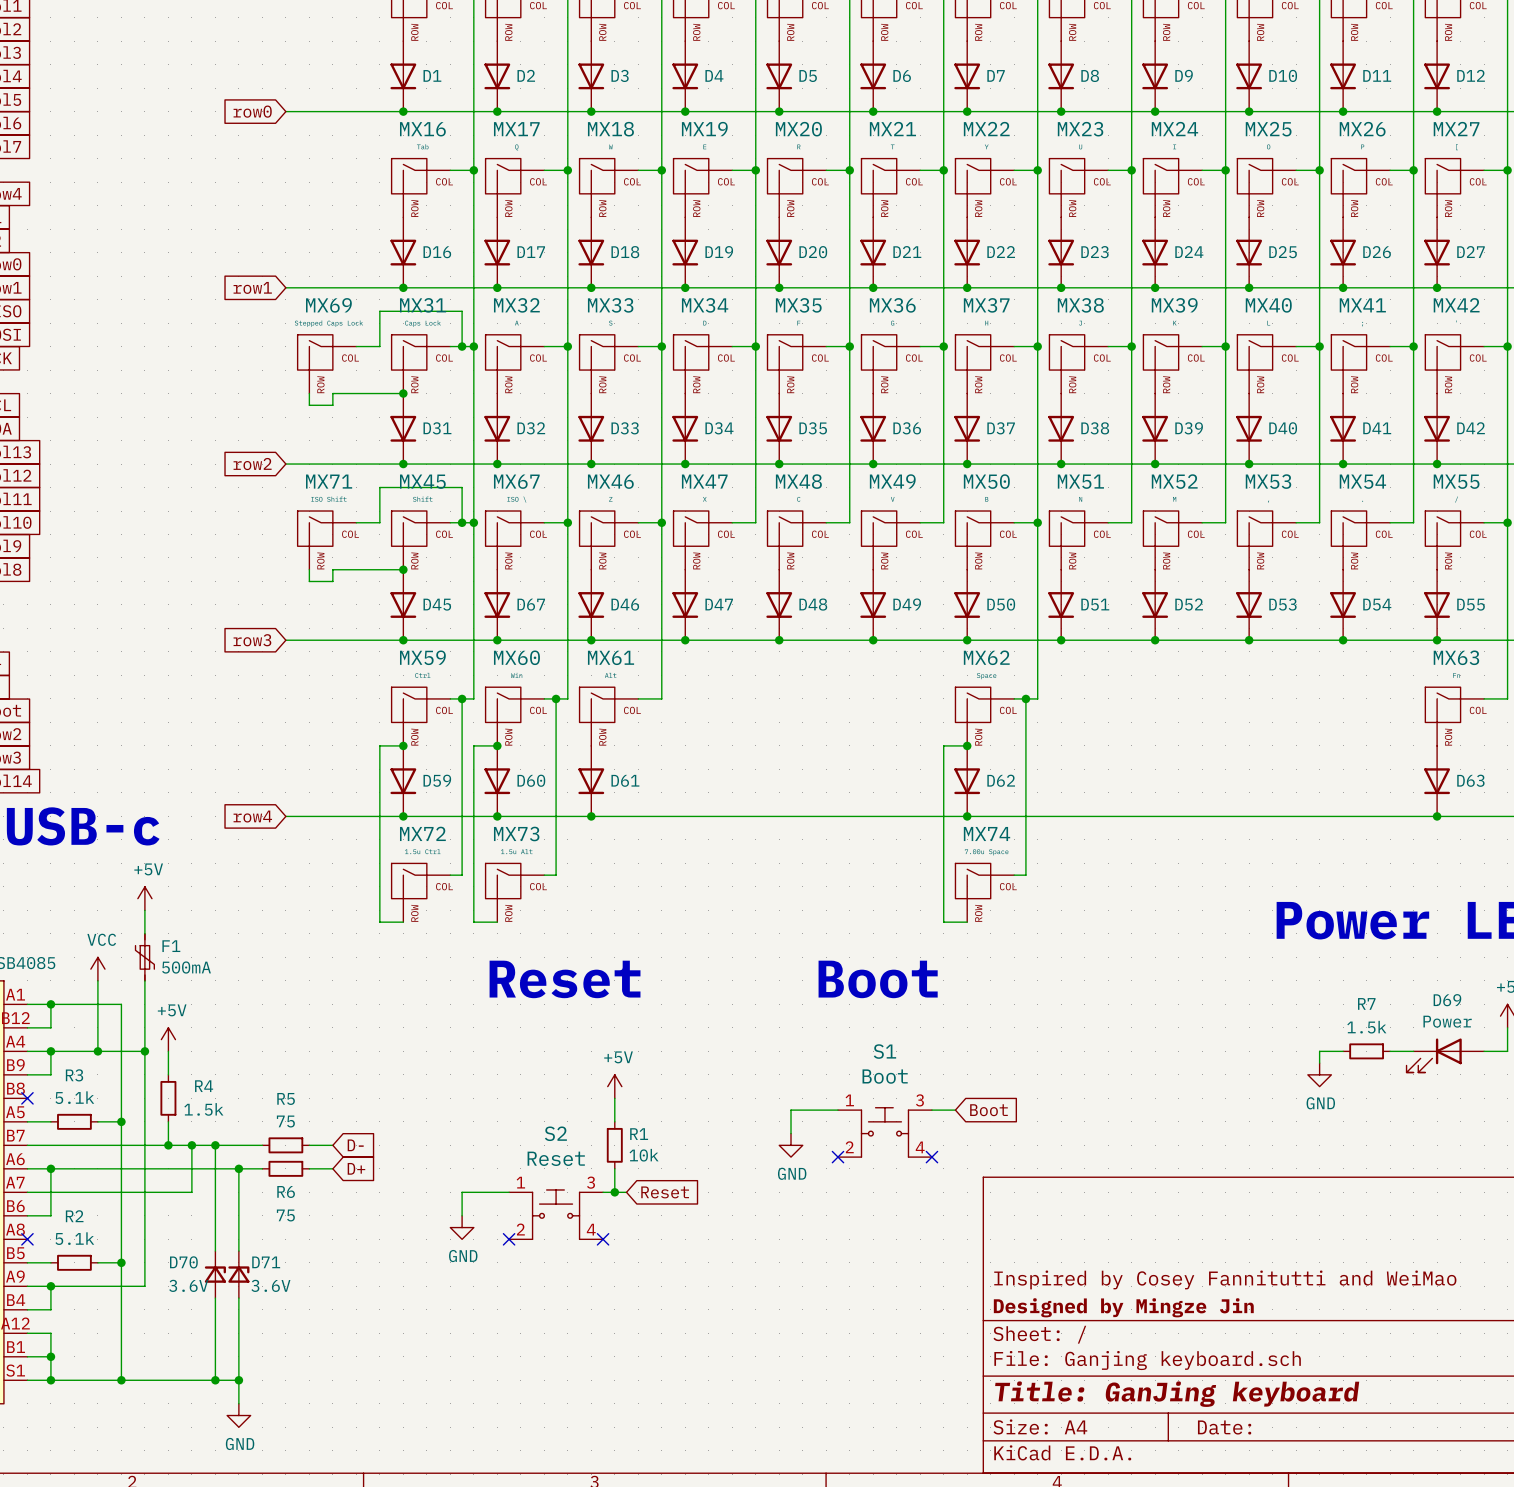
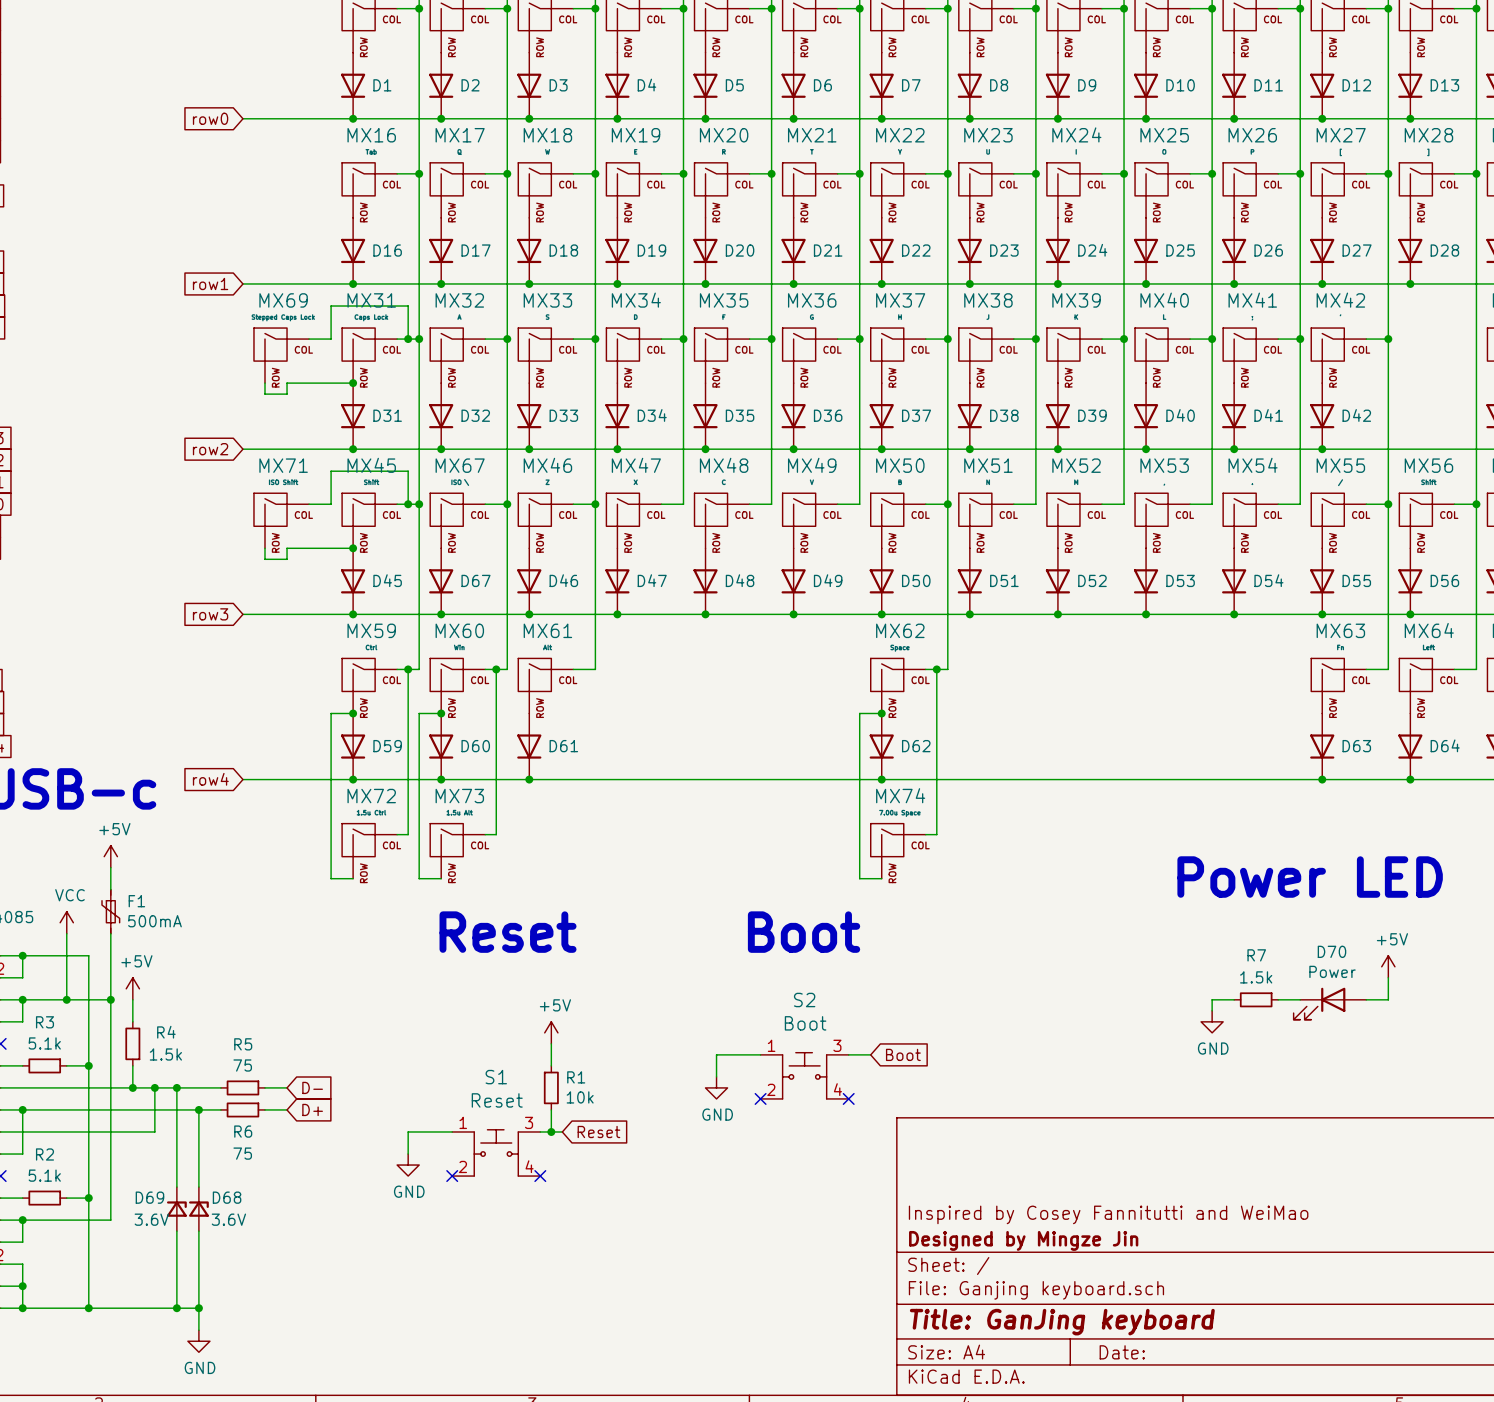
D69 name: D69 (1447, 1000) -> D70 (1331, 951)
S1 name: S1 (884, 1051) -> S2 (804, 1000)
S2 name: S2 (555, 1133) -> S1 (496, 1077)
D70 name: D70 (183, 1262) -> D69 (149, 1197)
D71 name: D71 (266, 1262) -> D68 (227, 1197)

